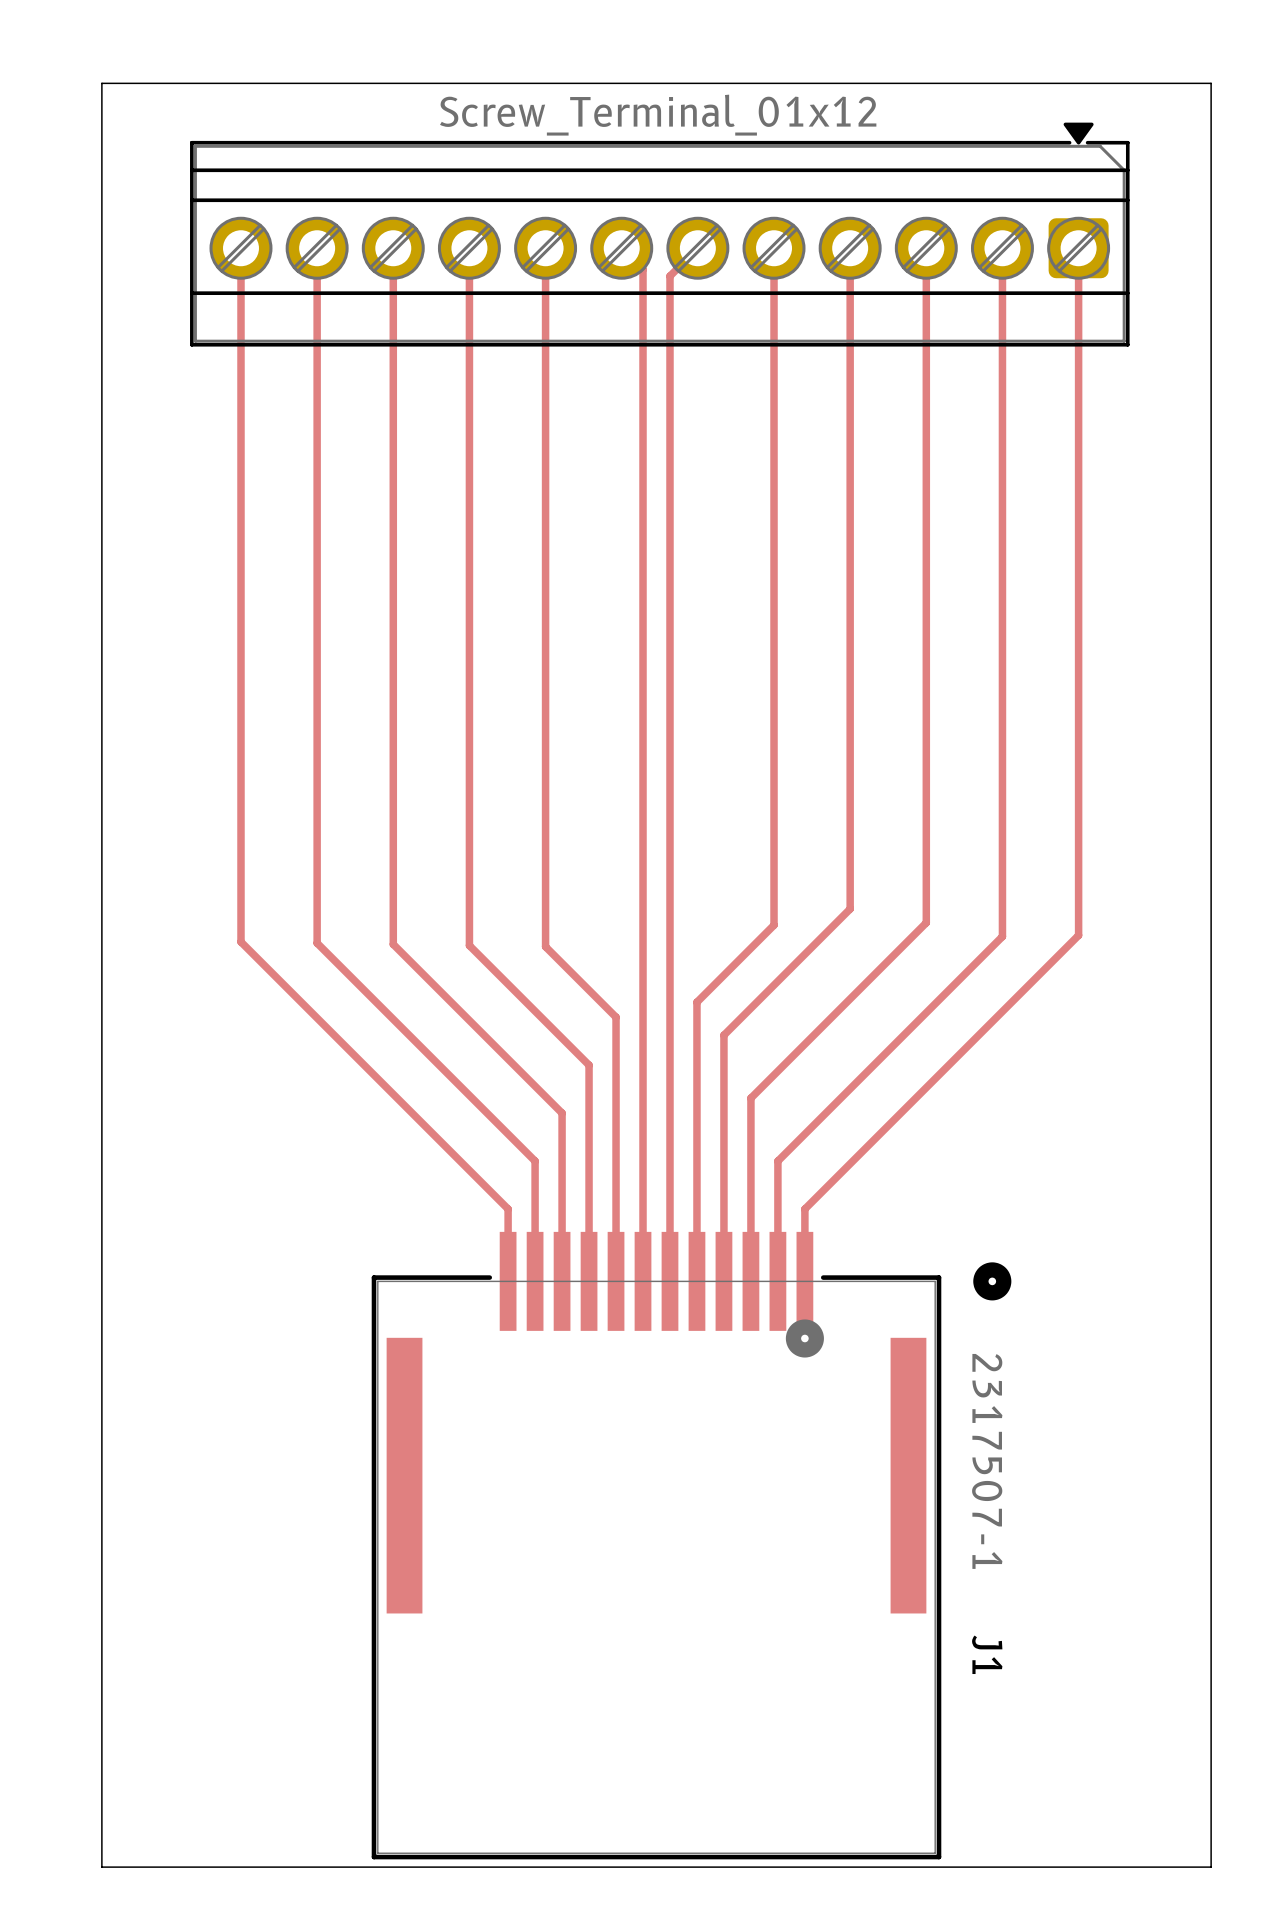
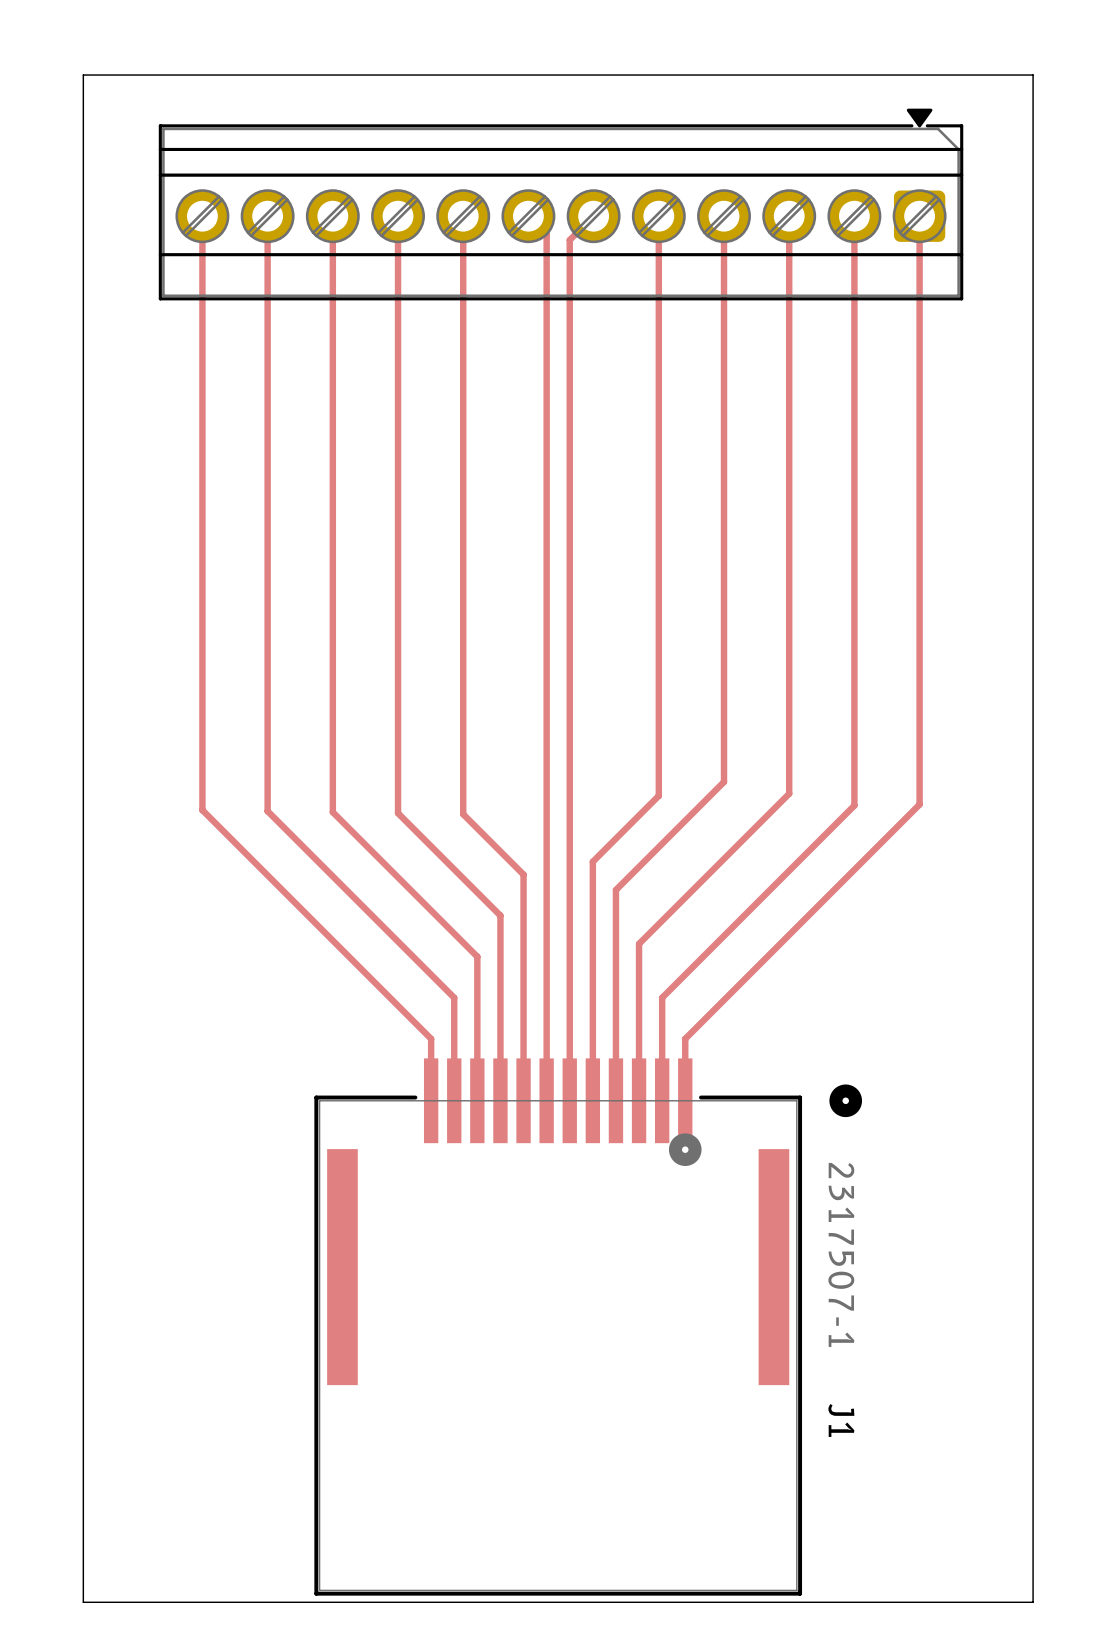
part value: Screw_Terminal_01x12 (658, 115) -> none

